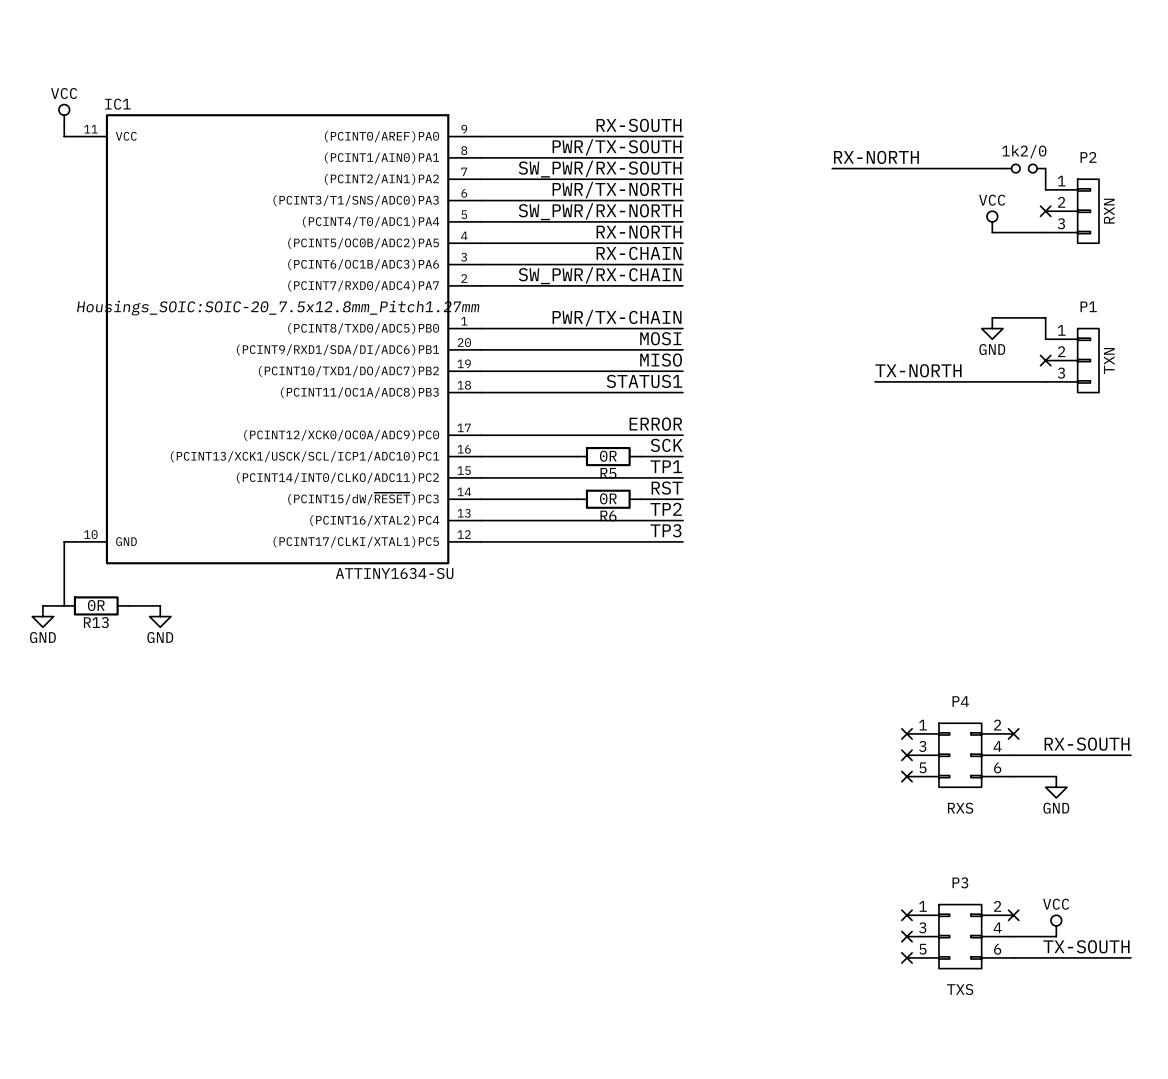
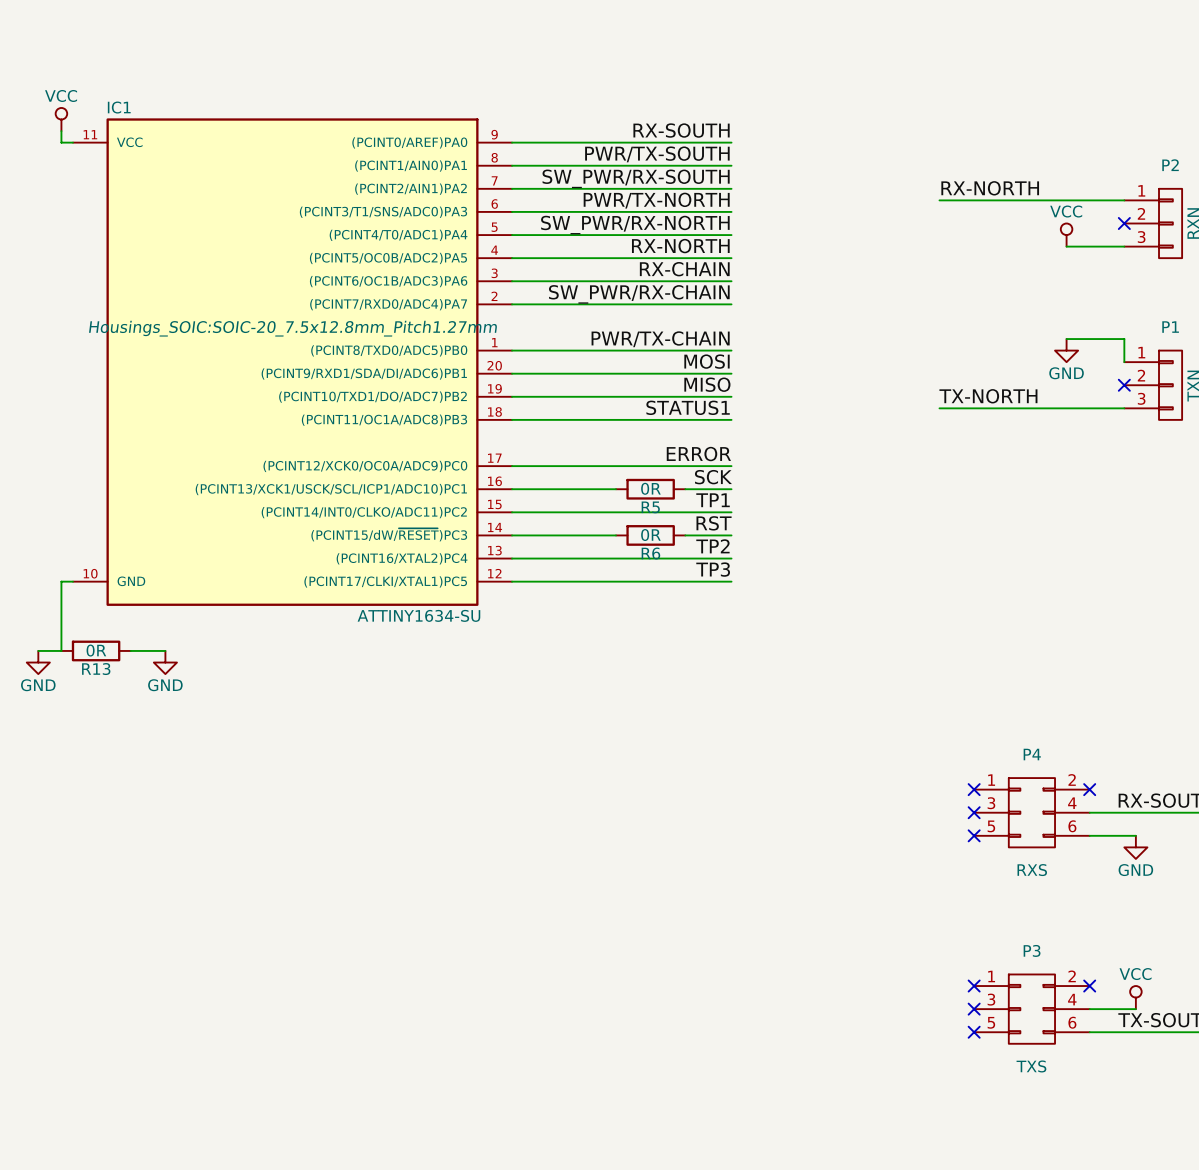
label position: RX-NORTH (876, 157) -> RX-NORTH (990, 188)
wire: (832, 168) (1002, 168) -> none
1k2/0: (1024, 168) -> none
wire: (1045, 168) (1045, 189) -> (939, 200) (1124, 200)

